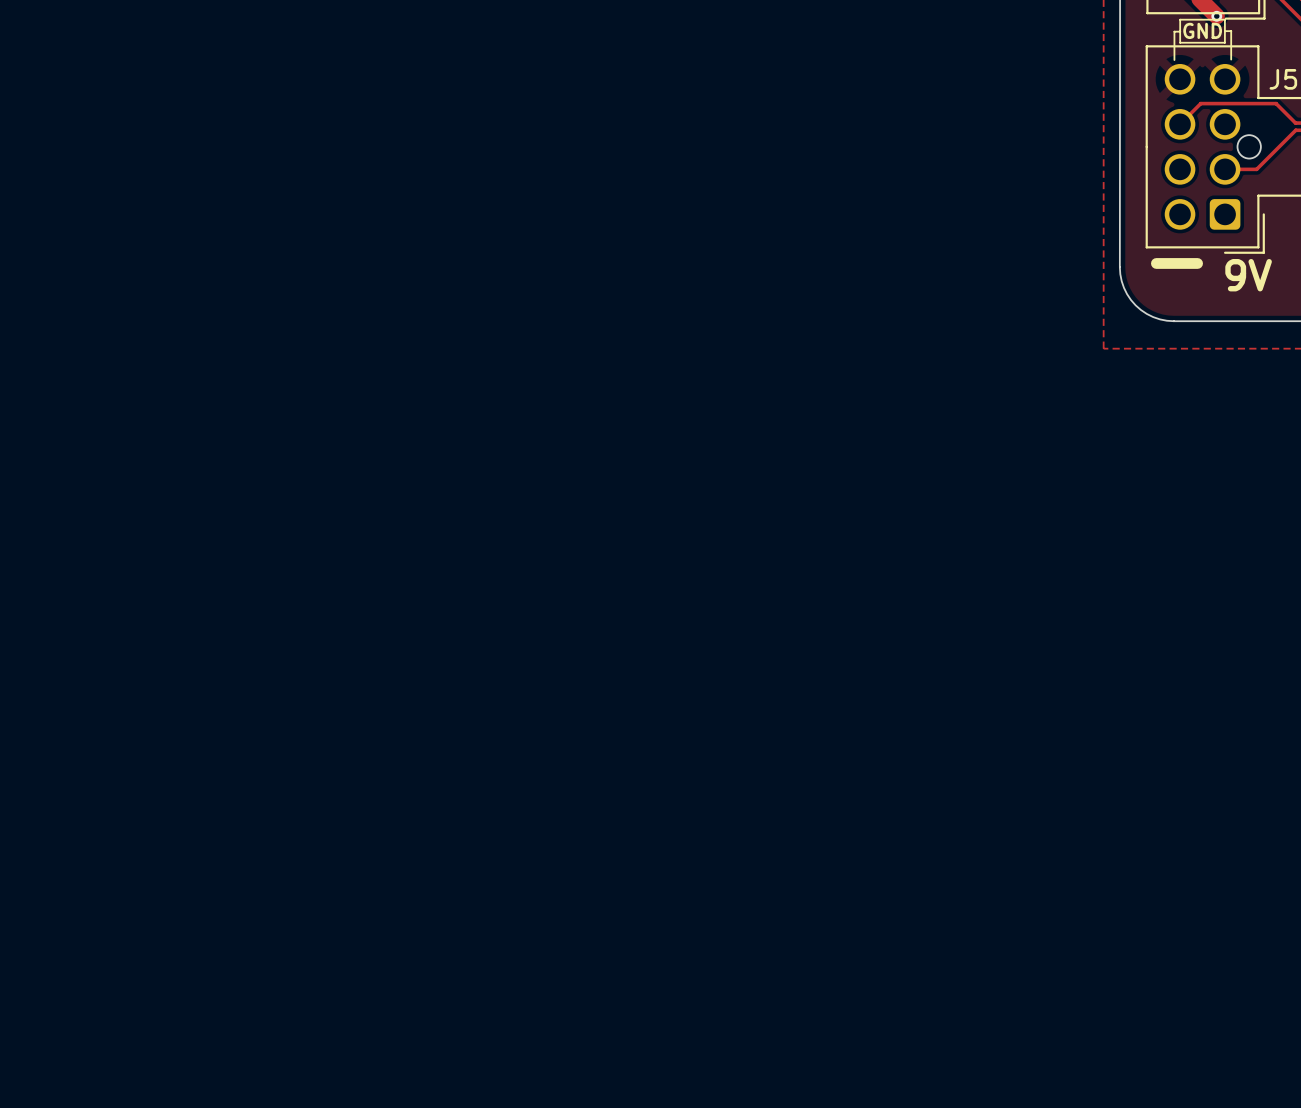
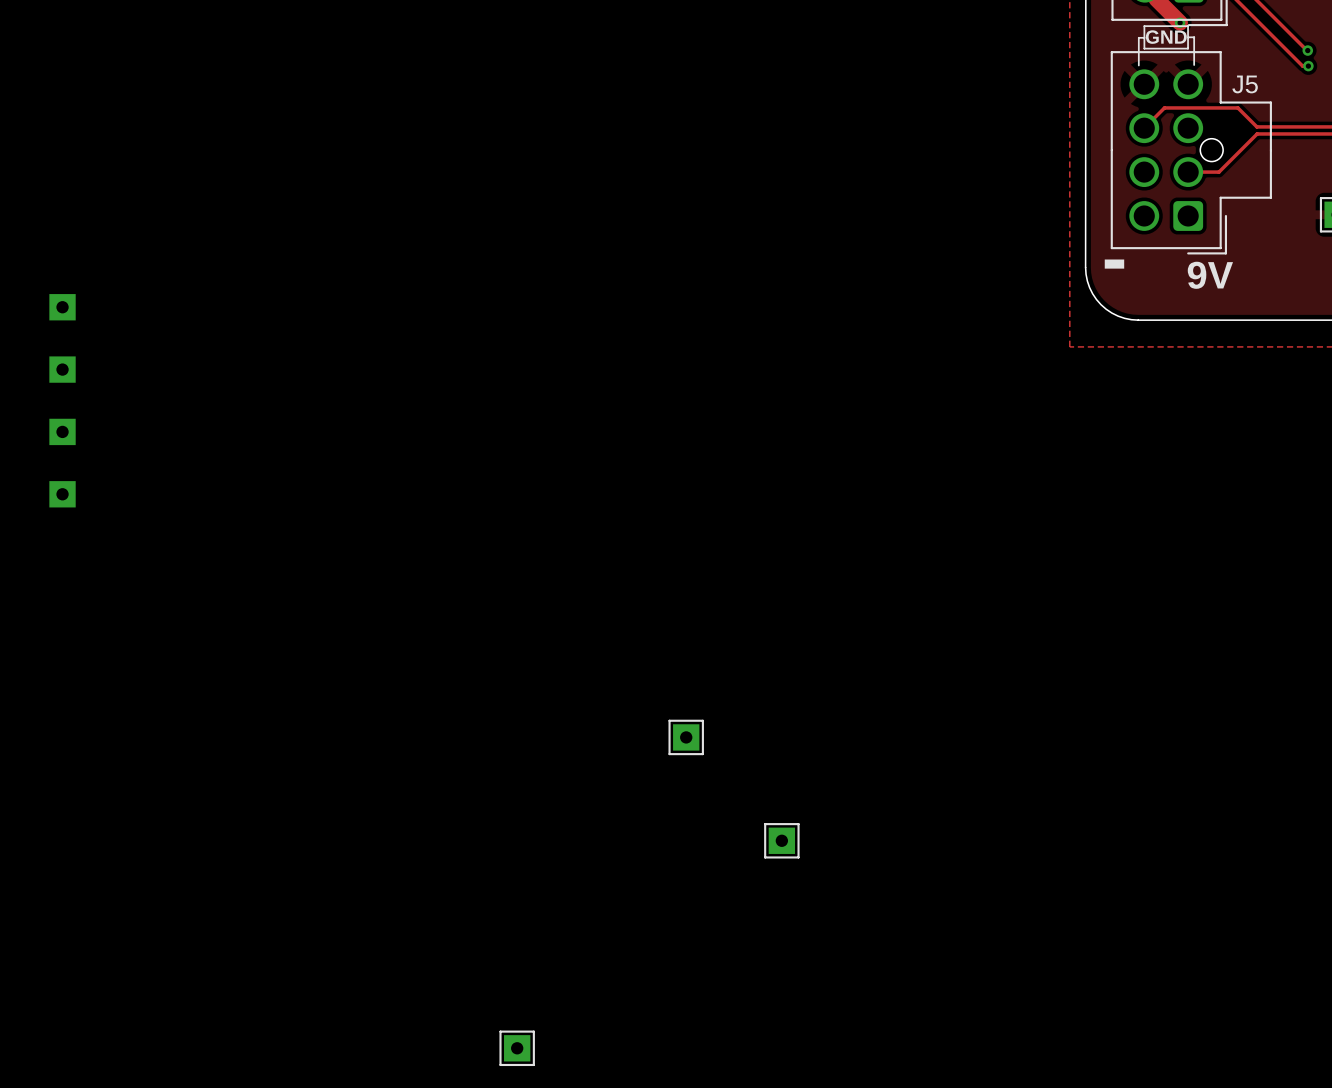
part: none -> (62, 307)
part: none -> (62, 369)
part: none -> (62, 431)
part: none -> (62, 494)
part: none -> (686, 737)
part: none -> (781, 840)
part: none -> (517, 1048)

